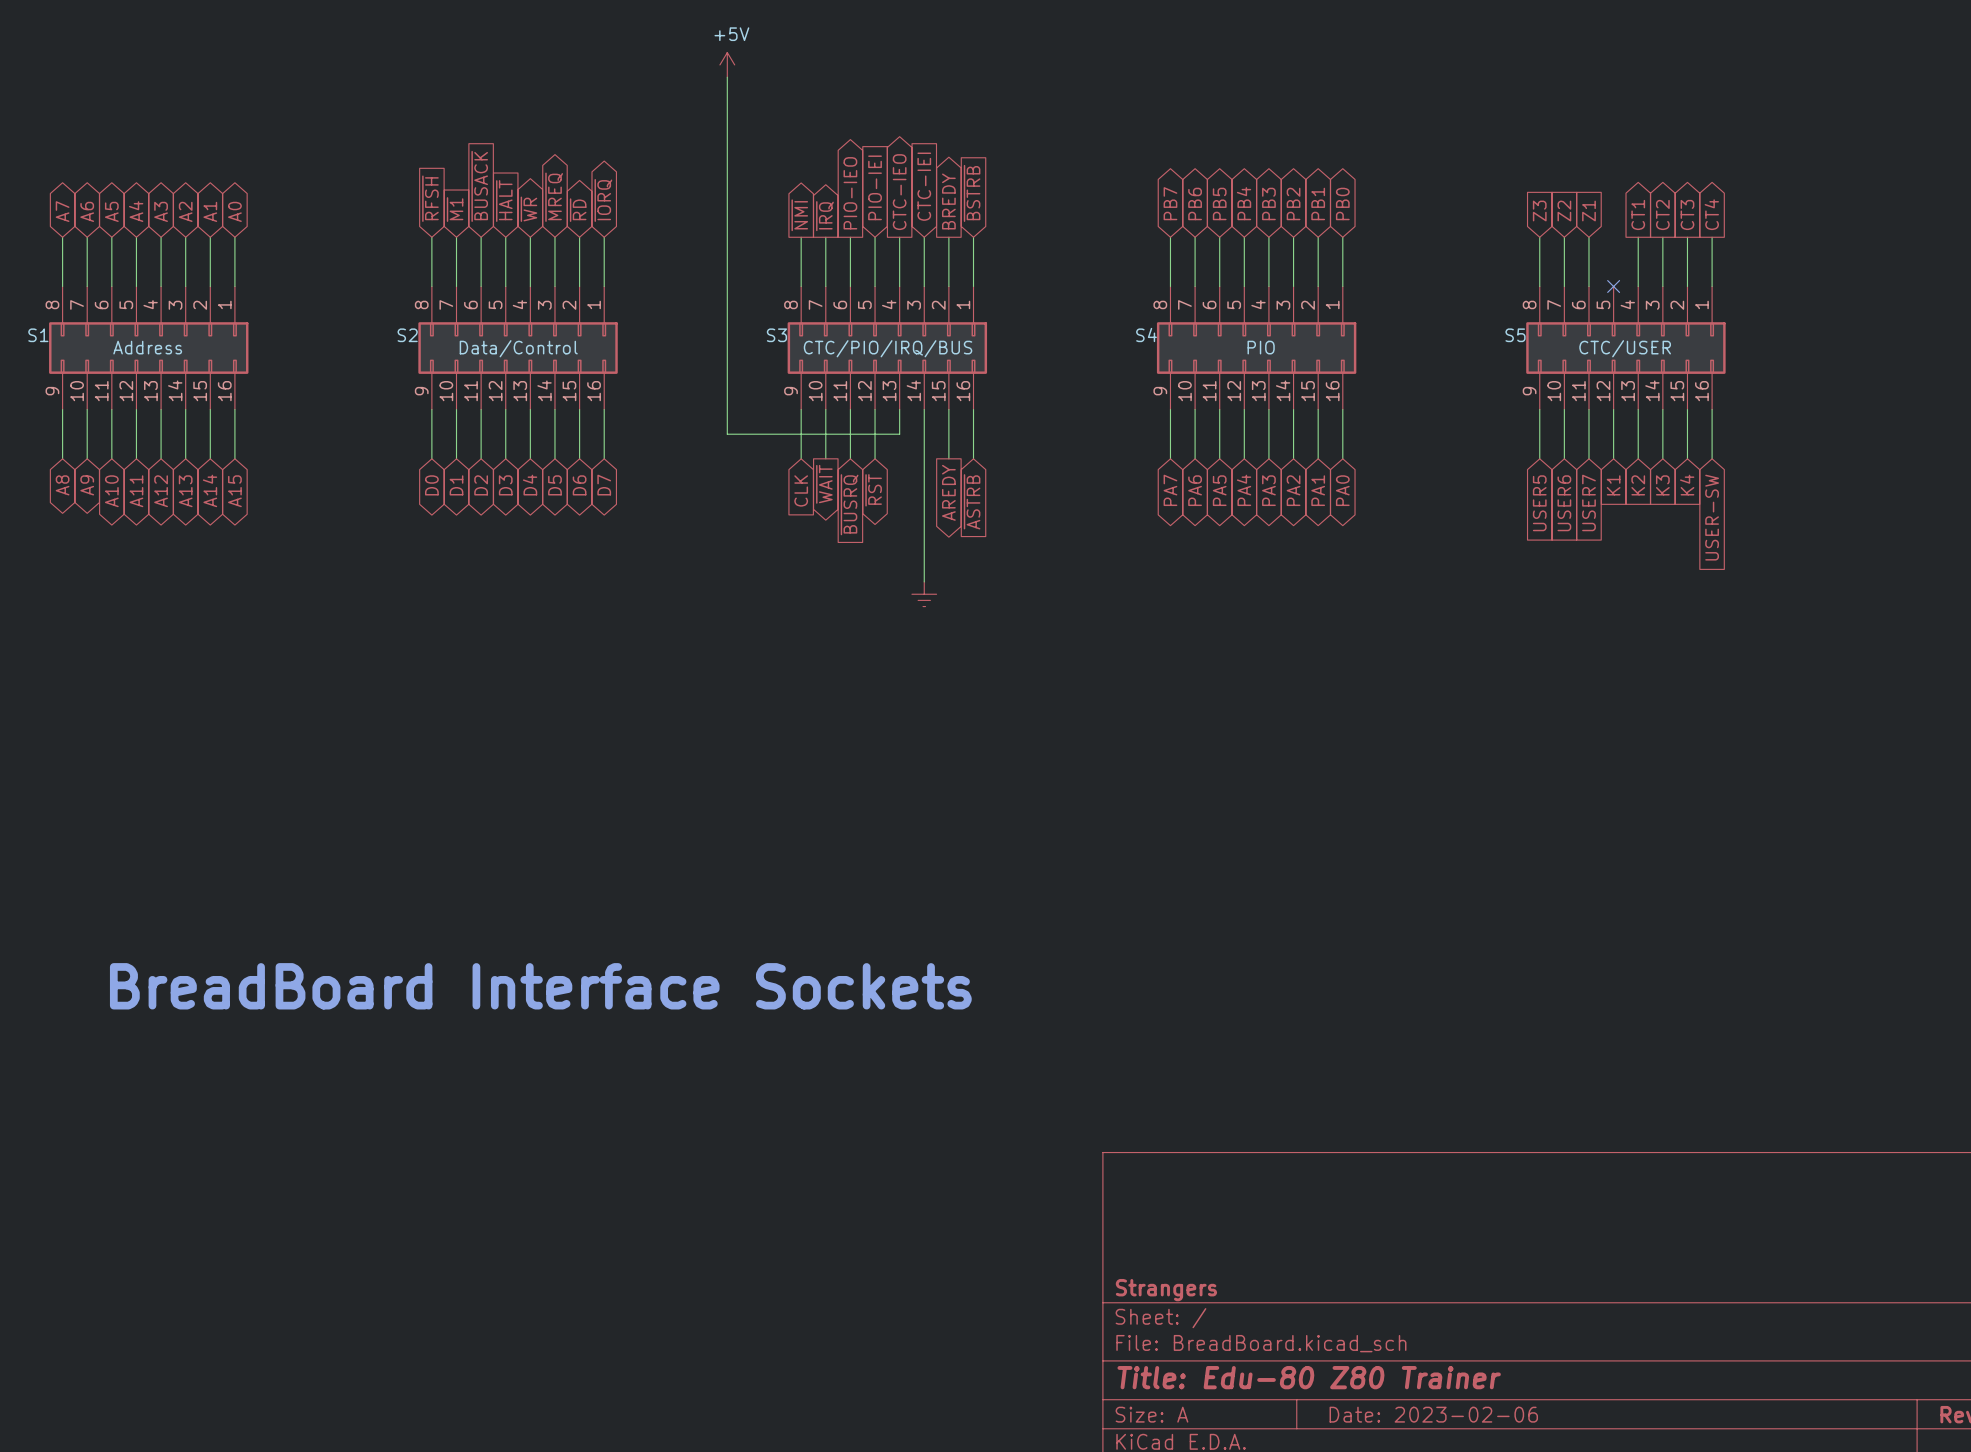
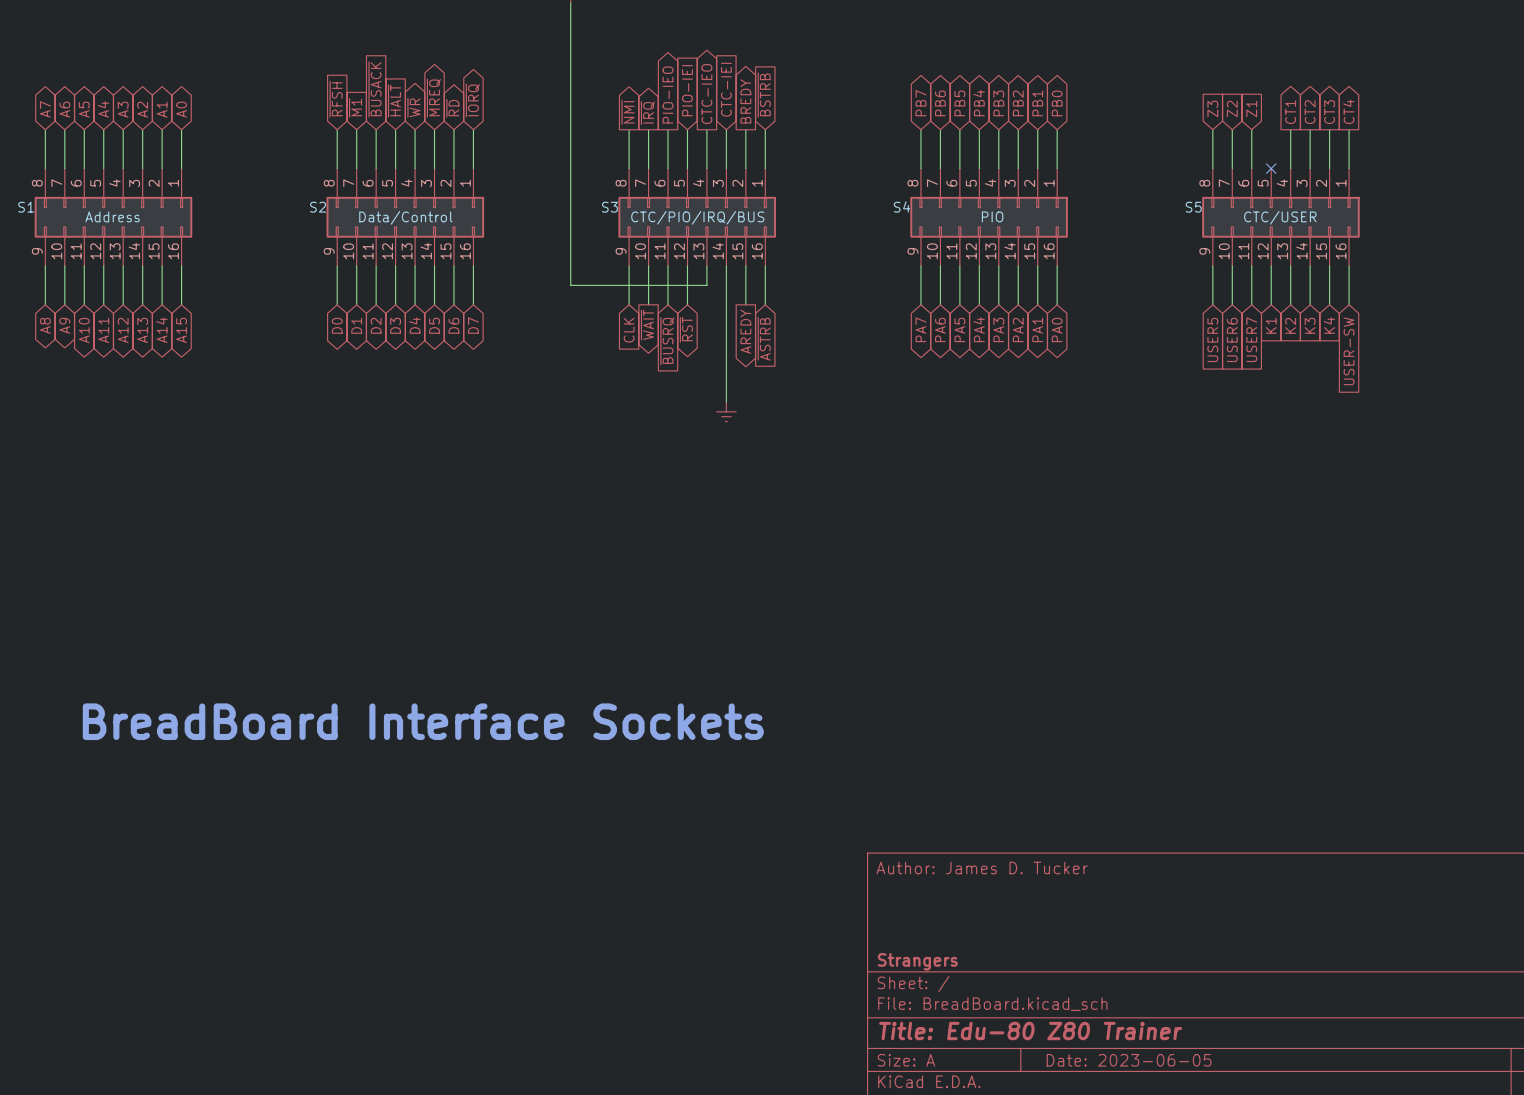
title block: none -> Author: James D. Tucker (982, 868)
title block: Date: 2023-02-06 (1433, 1414) -> Date: 2023-06-05 (1129, 1060)

